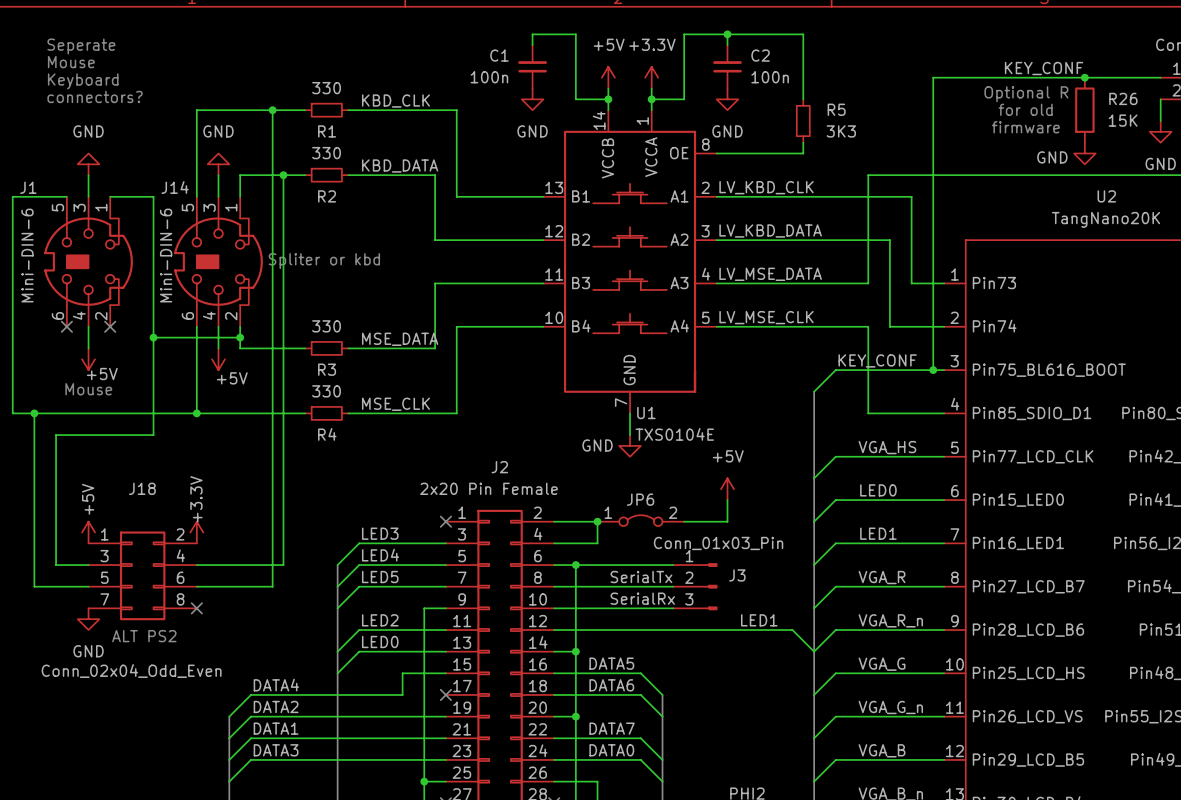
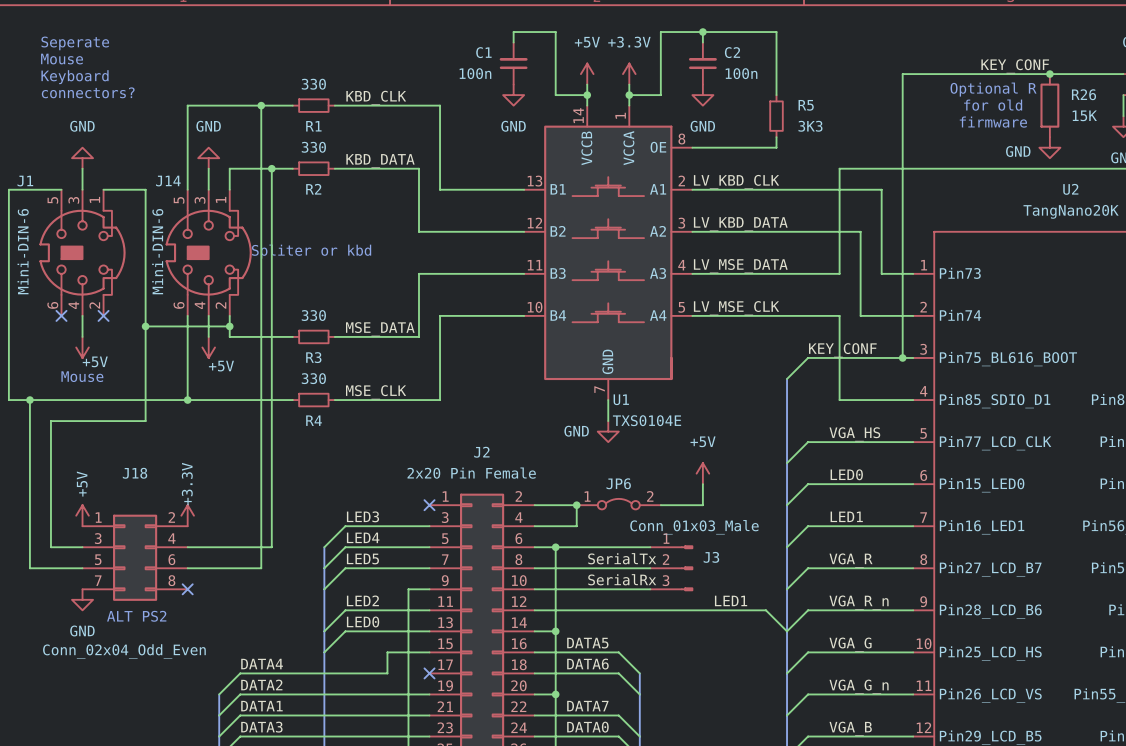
J3 value: Conn_01x03_Pin (718, 543) -> Conn_01x03_Male (694, 527)

